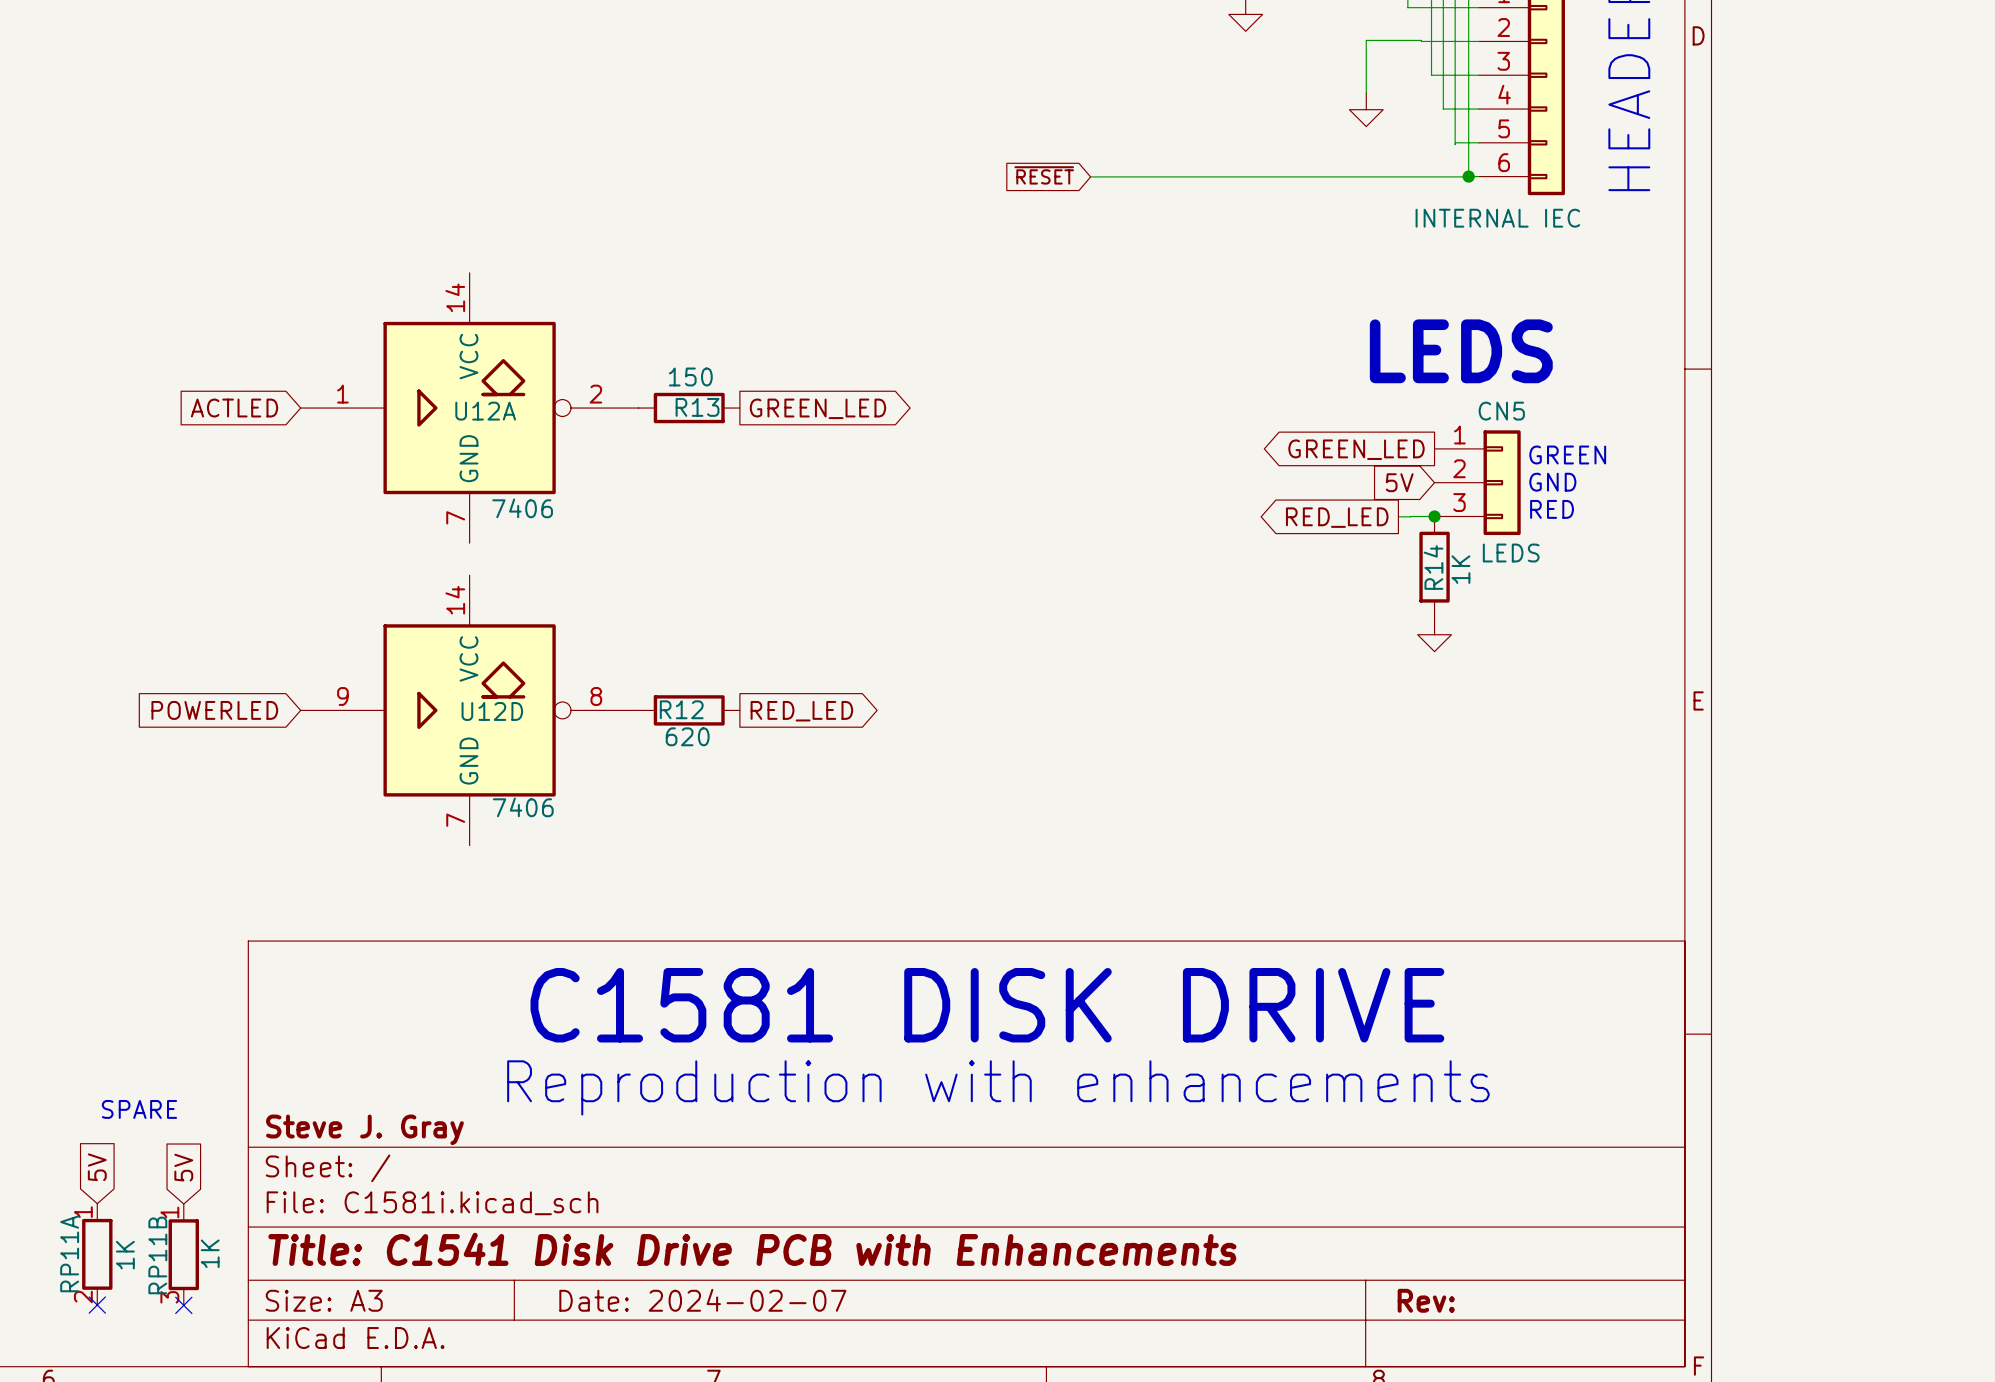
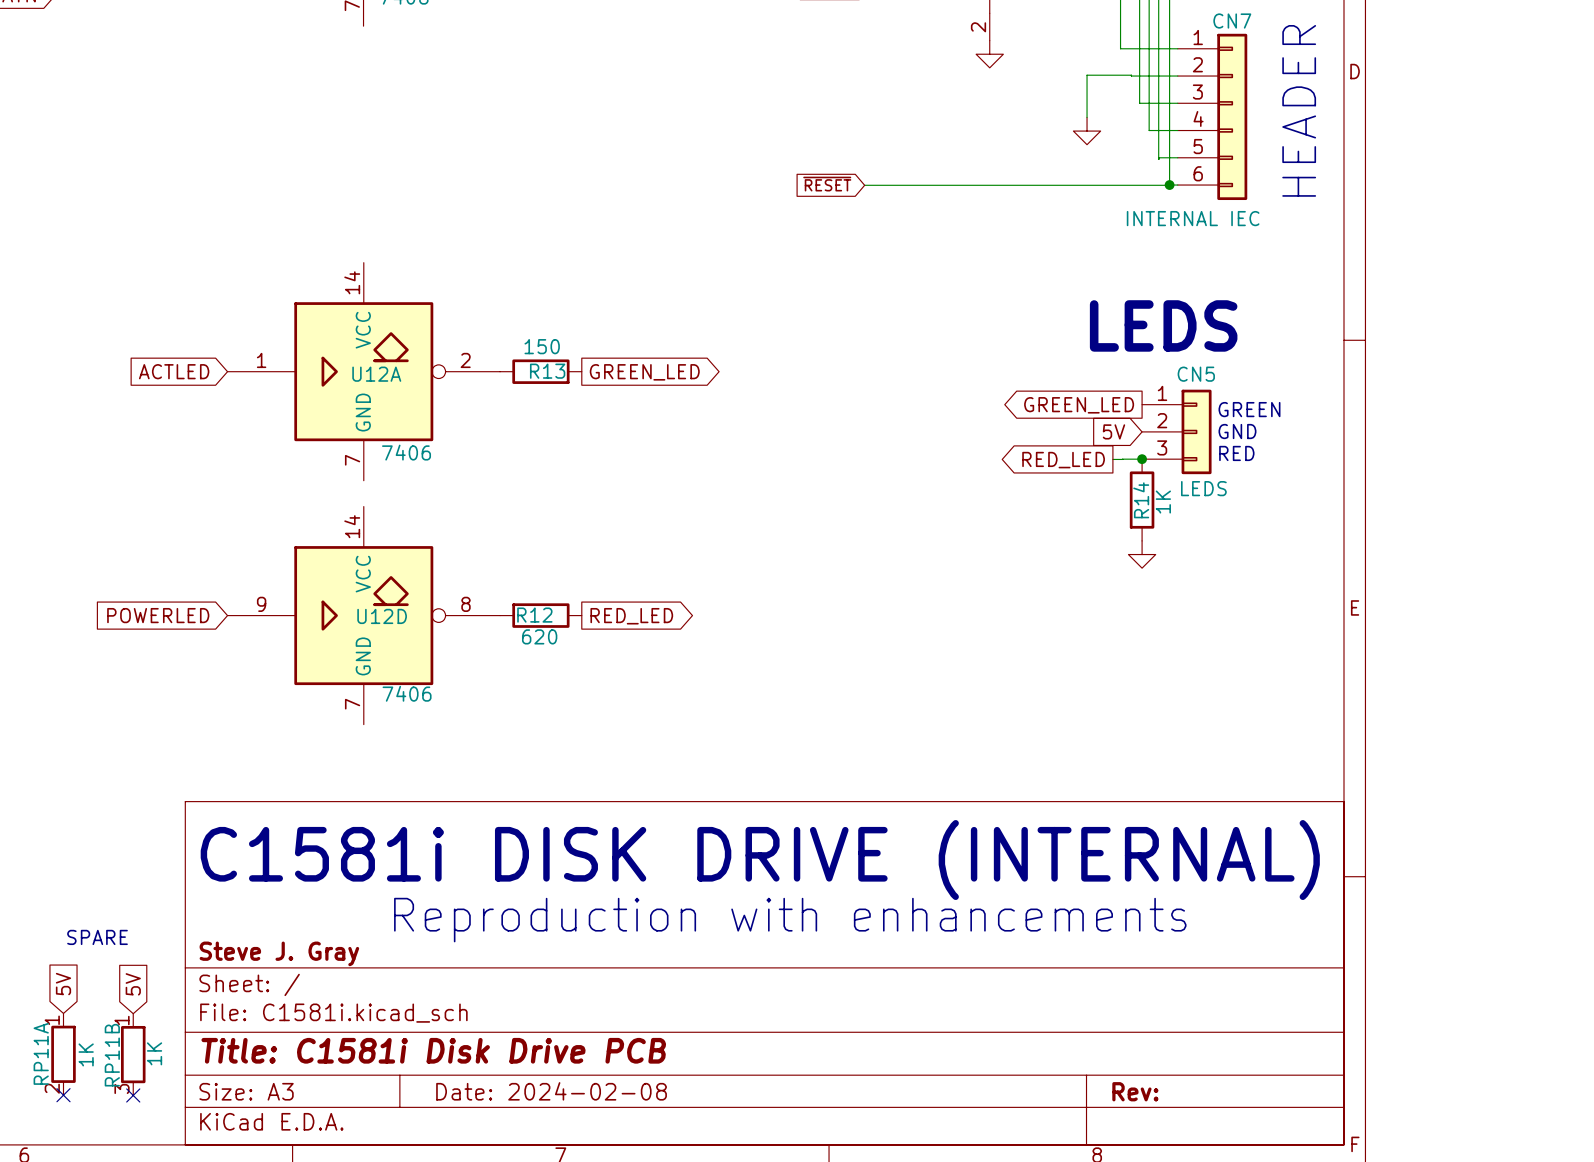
text: C1581 DISK DRIVE (987, 1005) -> C1581i DISK DRIVE (INTERNAL) (760, 860)
title block: Title: C1541 Disk Drive PCB with Enhancements (752, 1249) -> Title: C1581i Disk Drive PCB (433, 1050)
title block: Date: 2024-02-07 (702, 1300) -> Date: 2024-02-08 (551, 1091)

